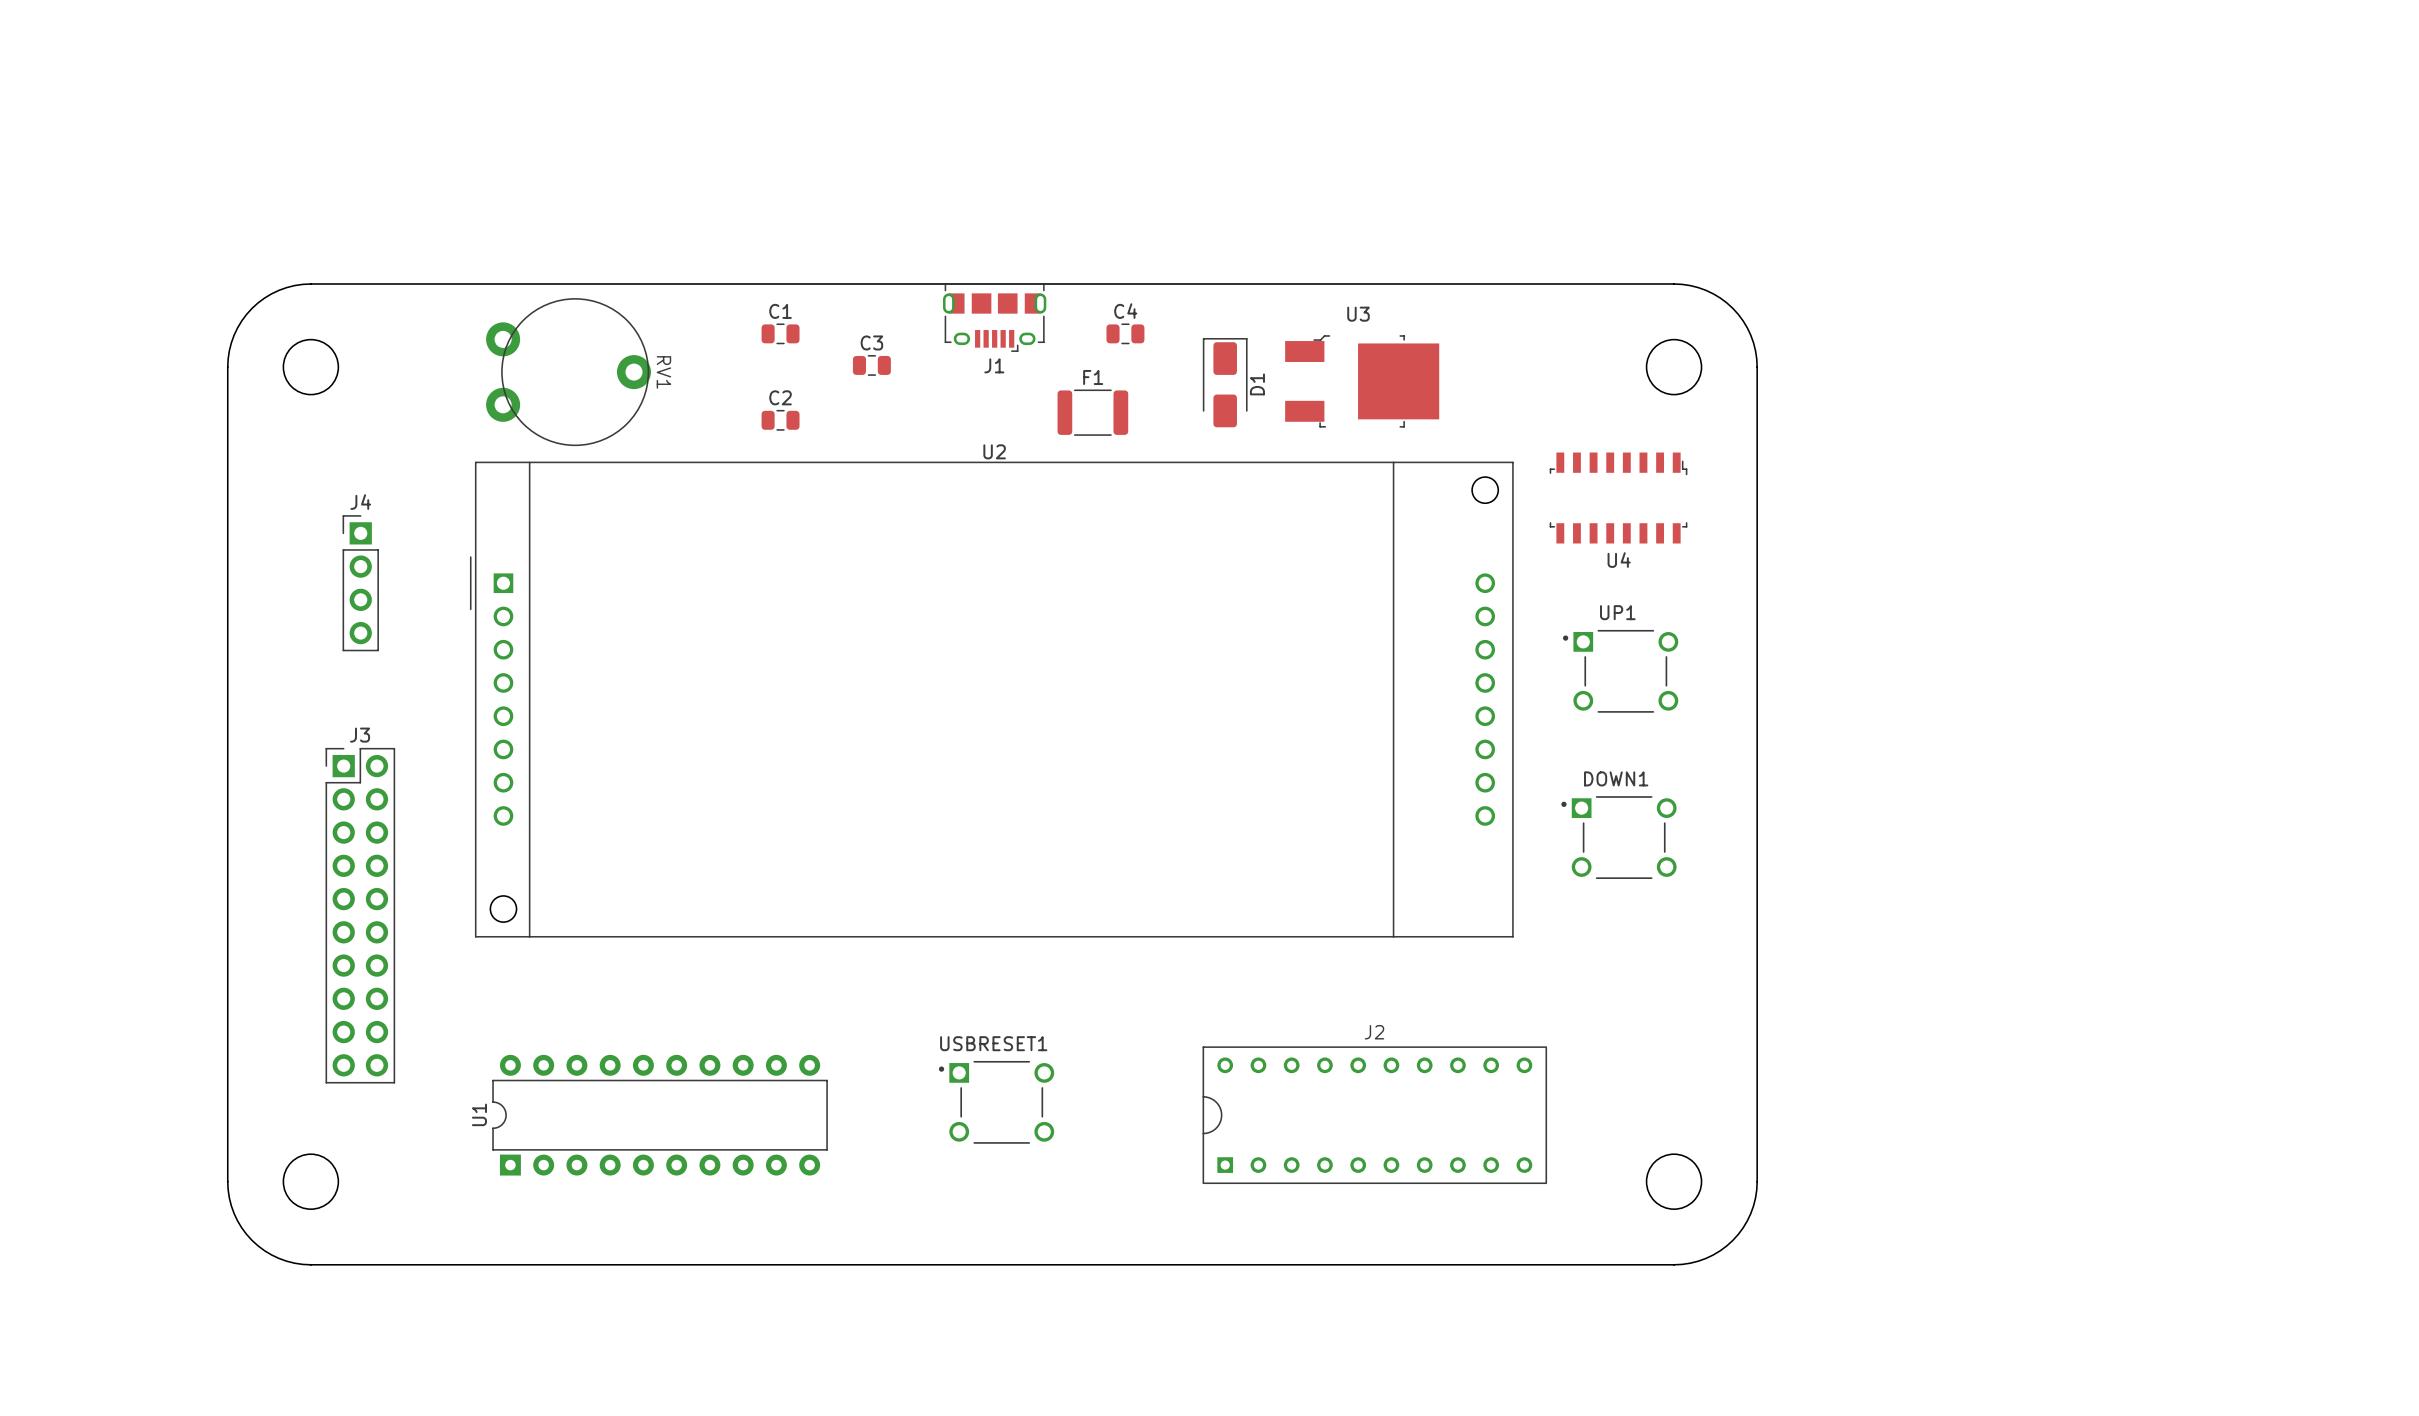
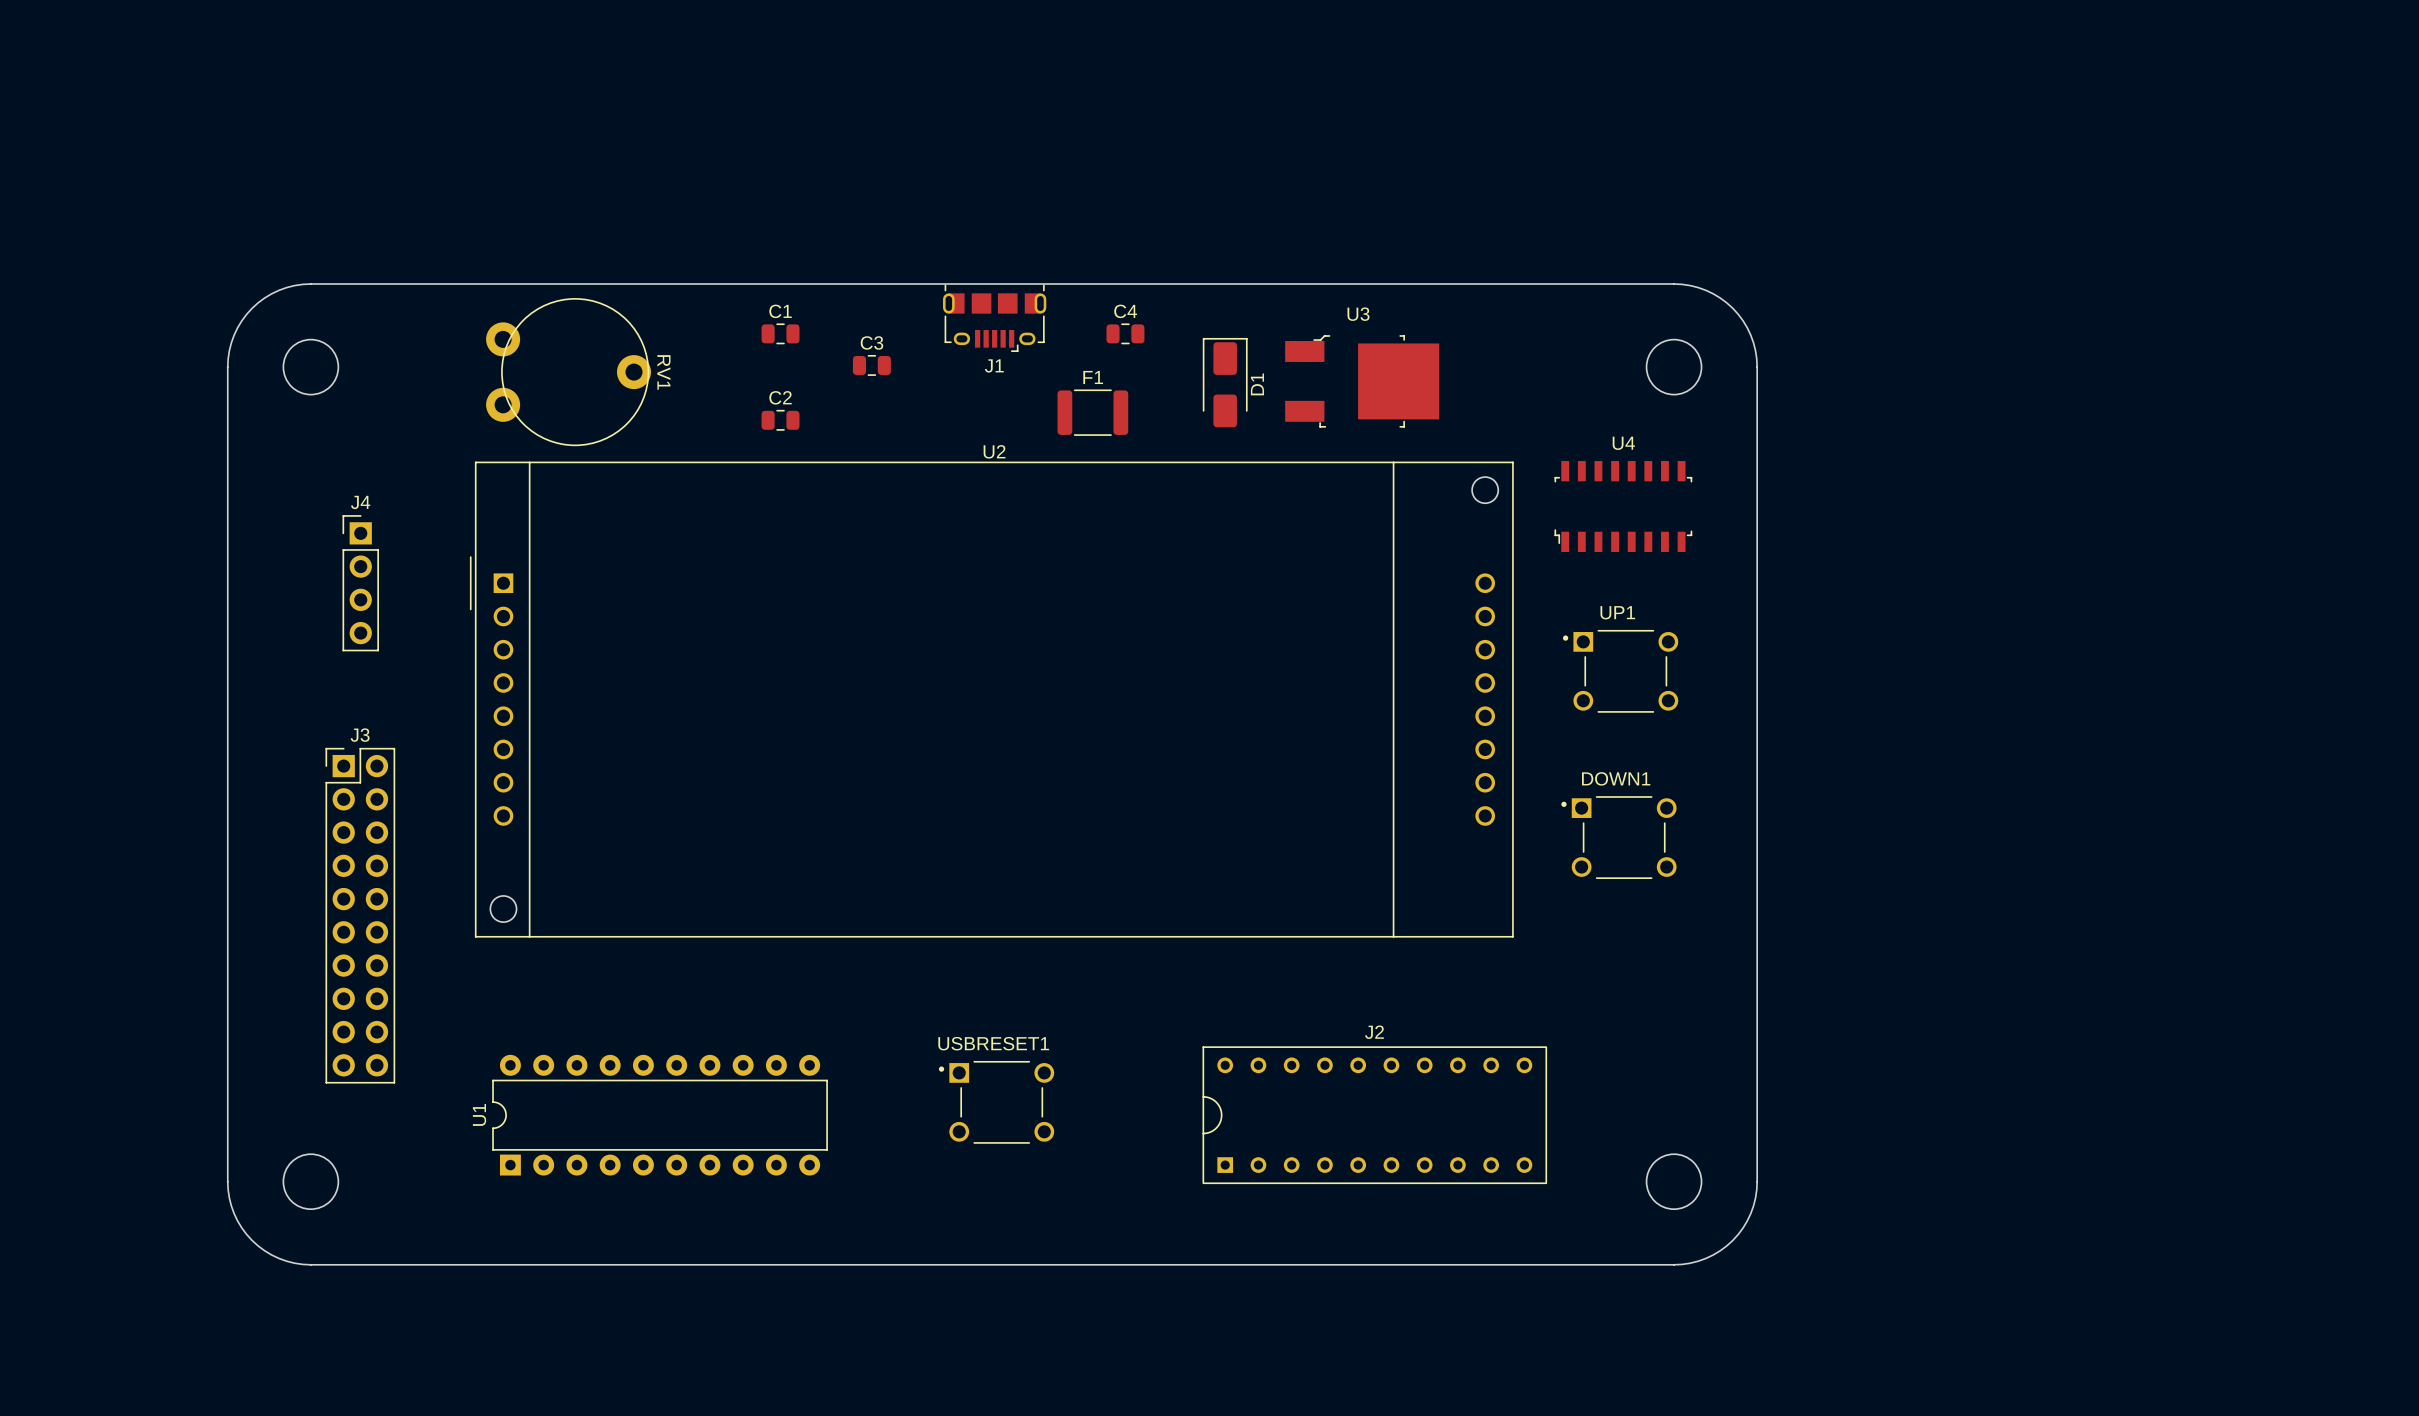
U4 rotation: 0° (1618, 498) -> 180° (1623, 506)

